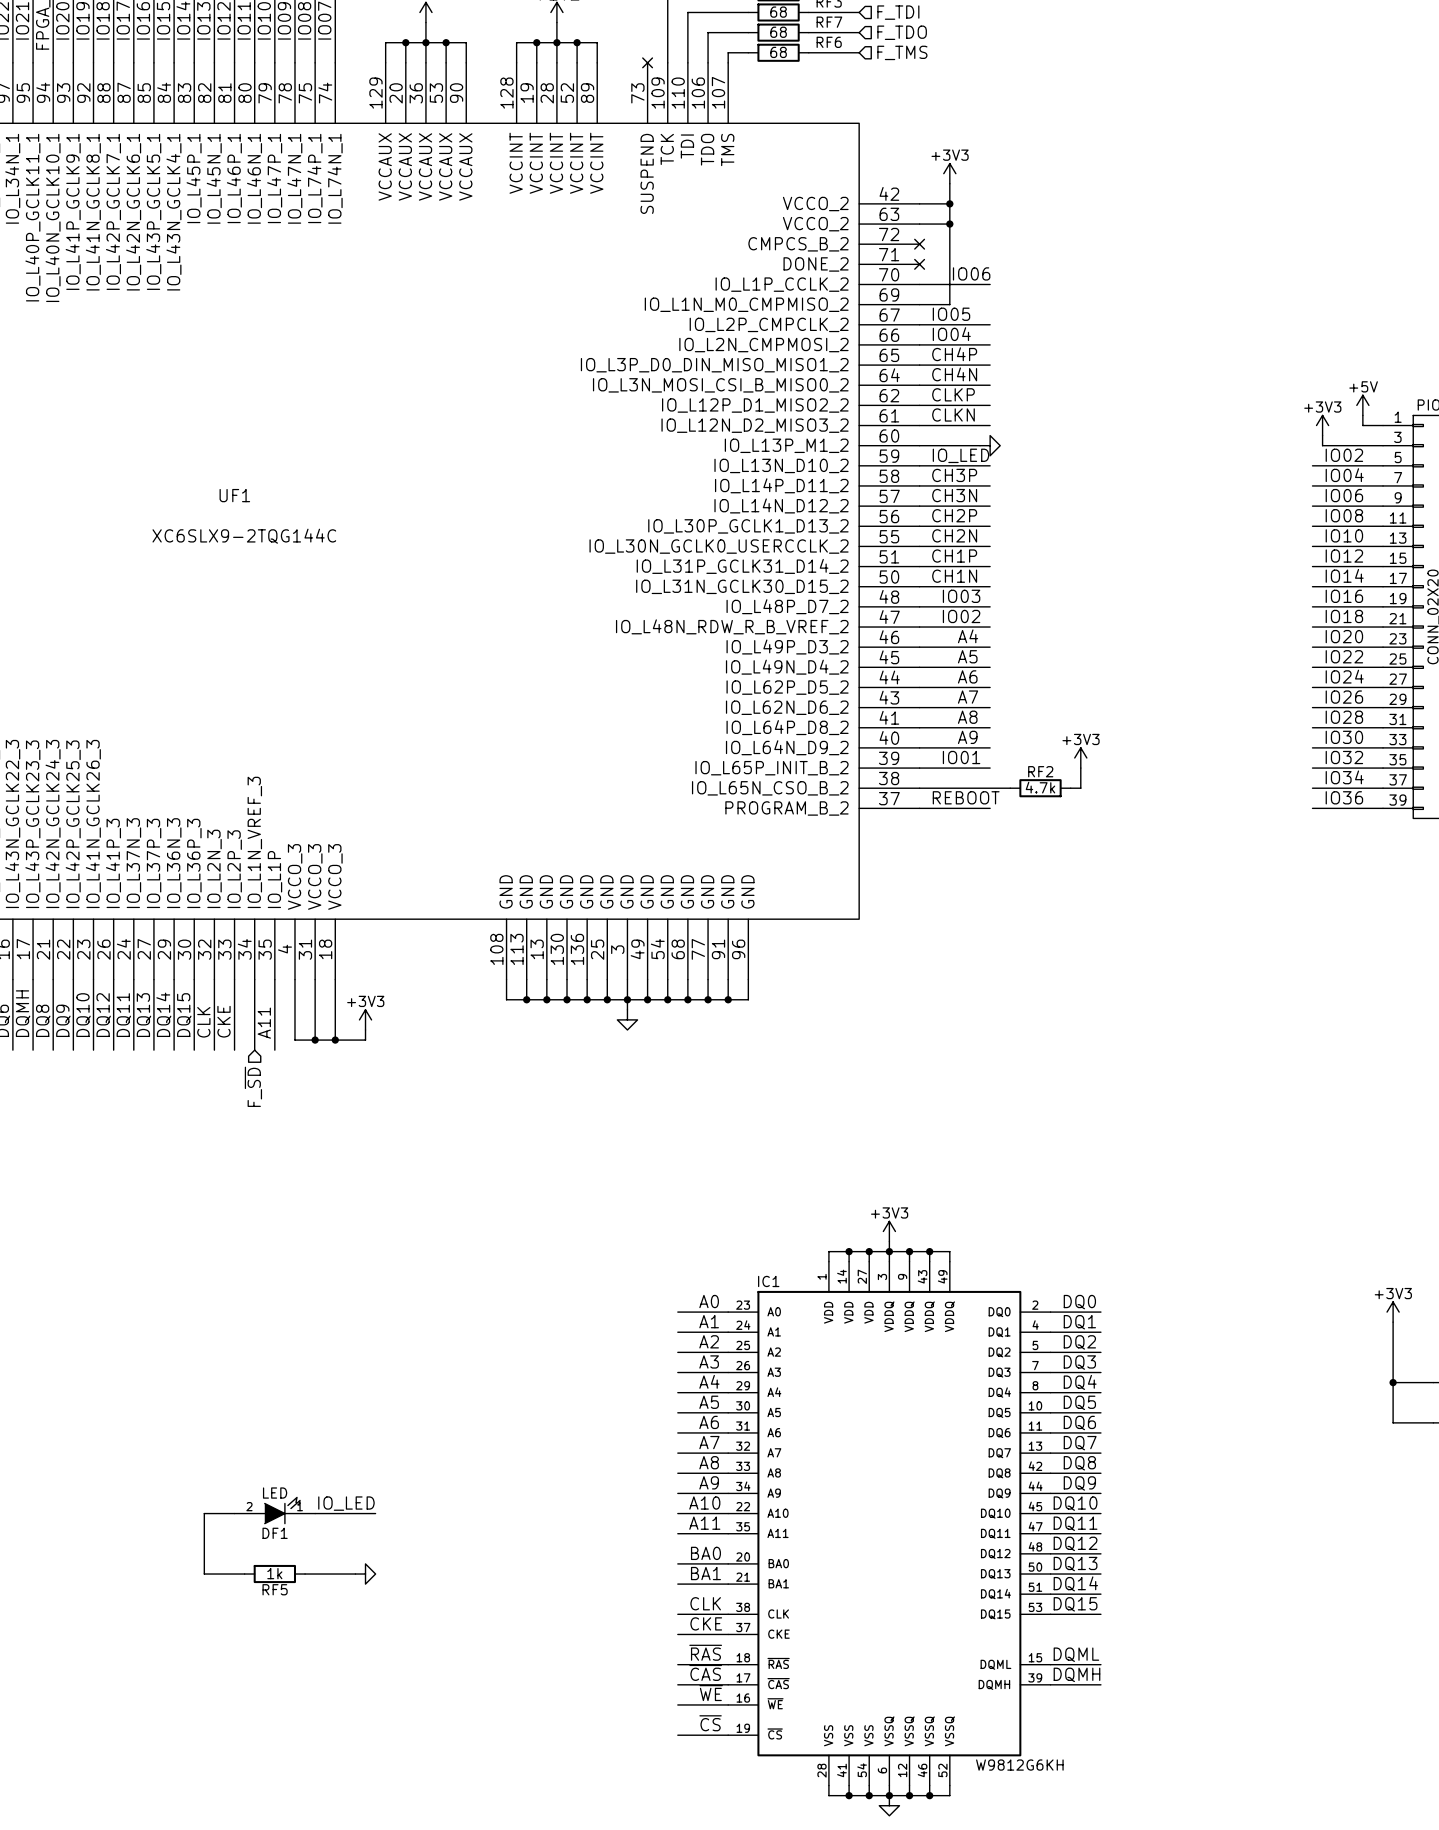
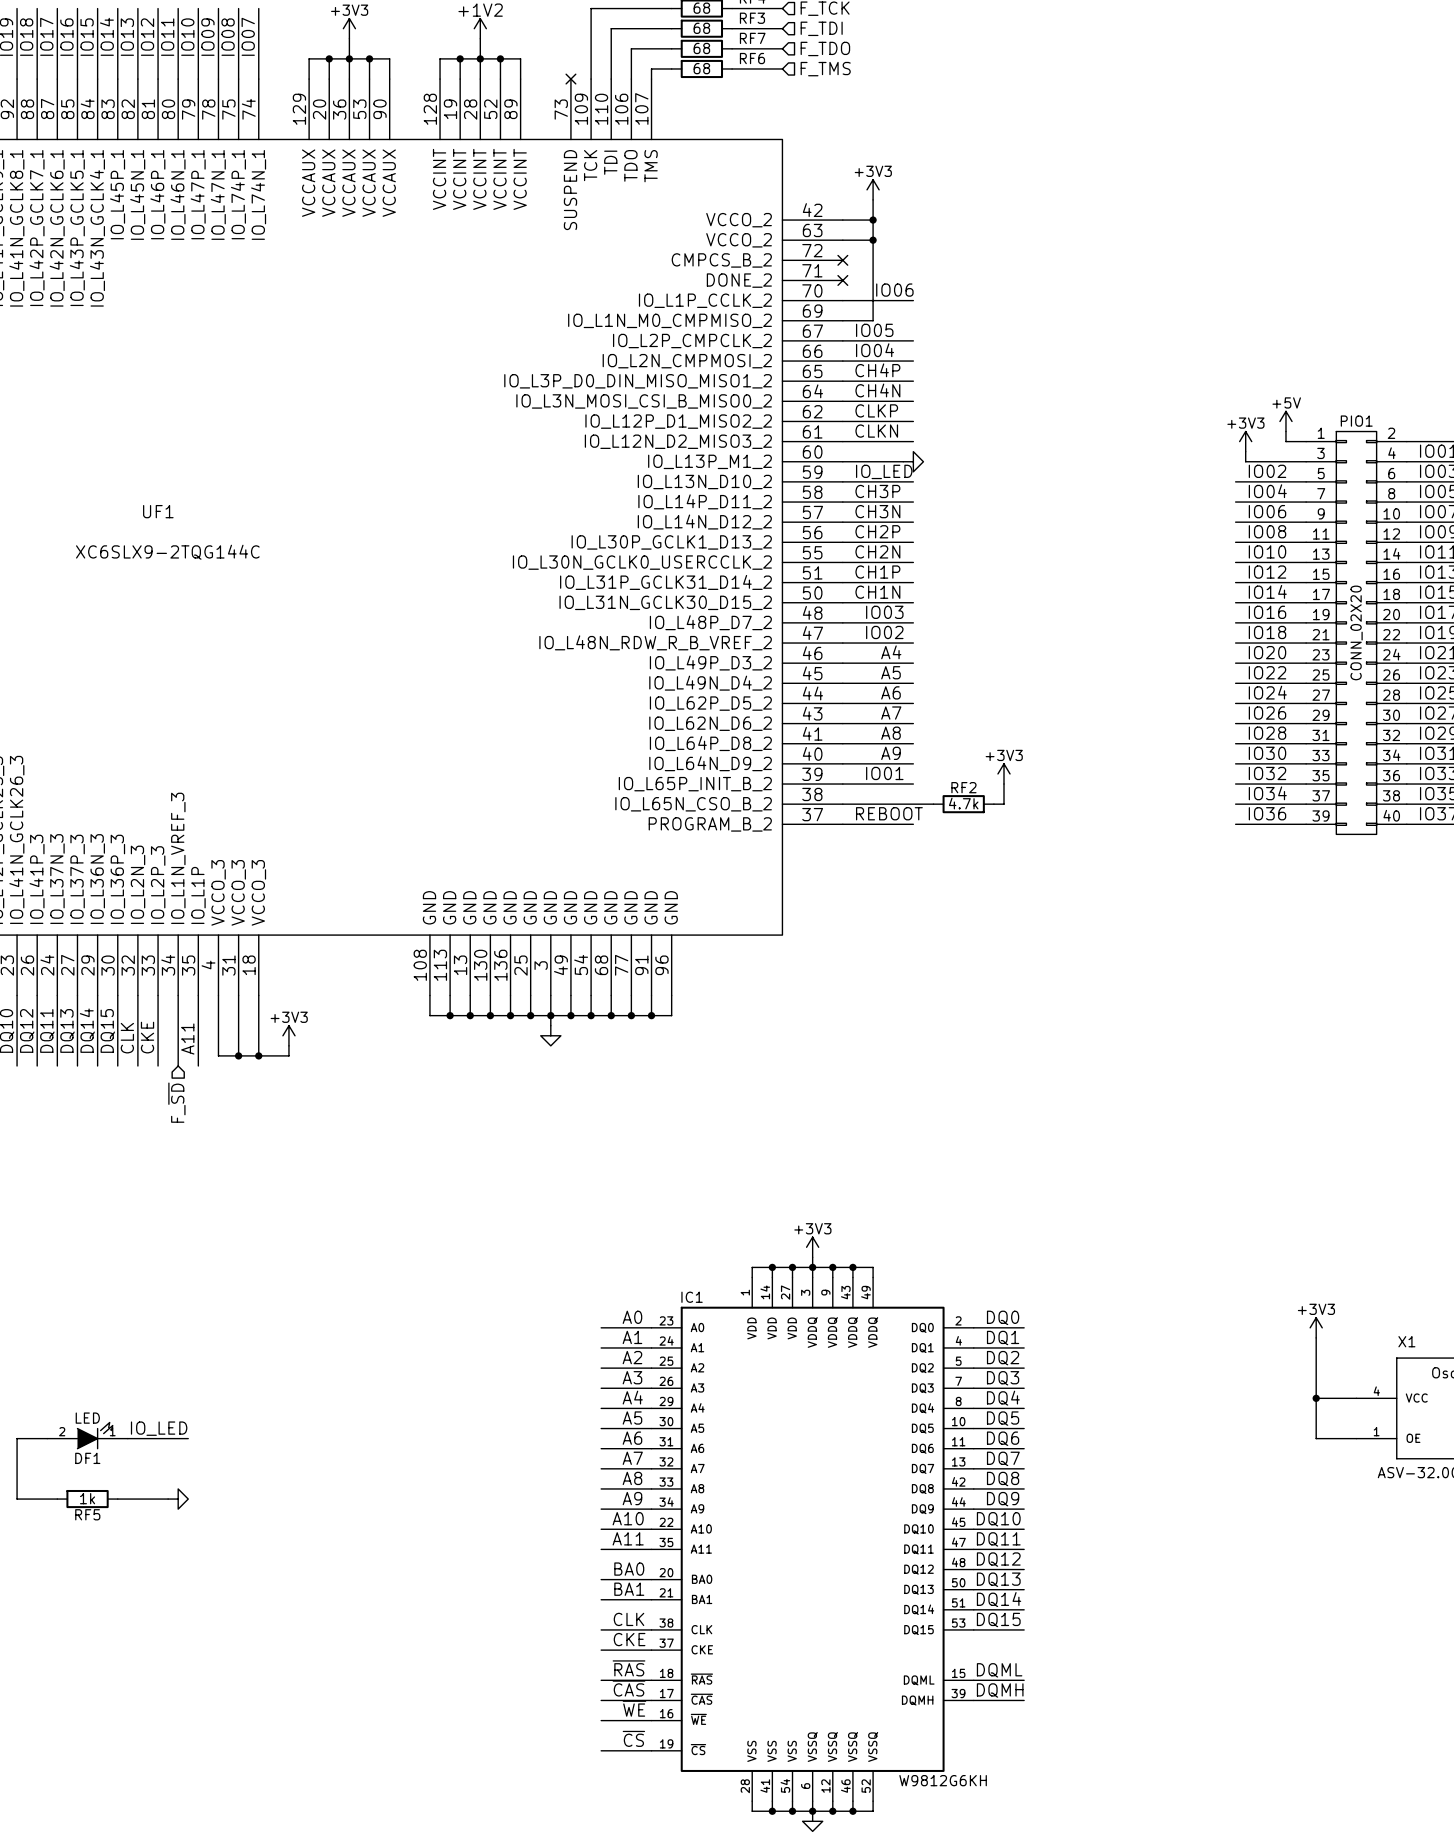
label position: IO_LED (346, 1503) -> IO_LED (159, 1428)
DF1 position: (274, 1510) -> (87, 1435)
wire: (234, 1513) (204, 1513) (204, 1574) (244, 1574) -> (47, 1438) (17, 1438) (17, 1499) (57, 1499)
wire: (315, 1513) (375, 1513) -> (127, 1438) (188, 1438)
RF5 position: (274, 1574) -> (87, 1499)
wire: (305, 1574) (355, 1574) -> (117, 1499) (168, 1499)
power symbol position: (365, 1574) -> (178, 1499)

